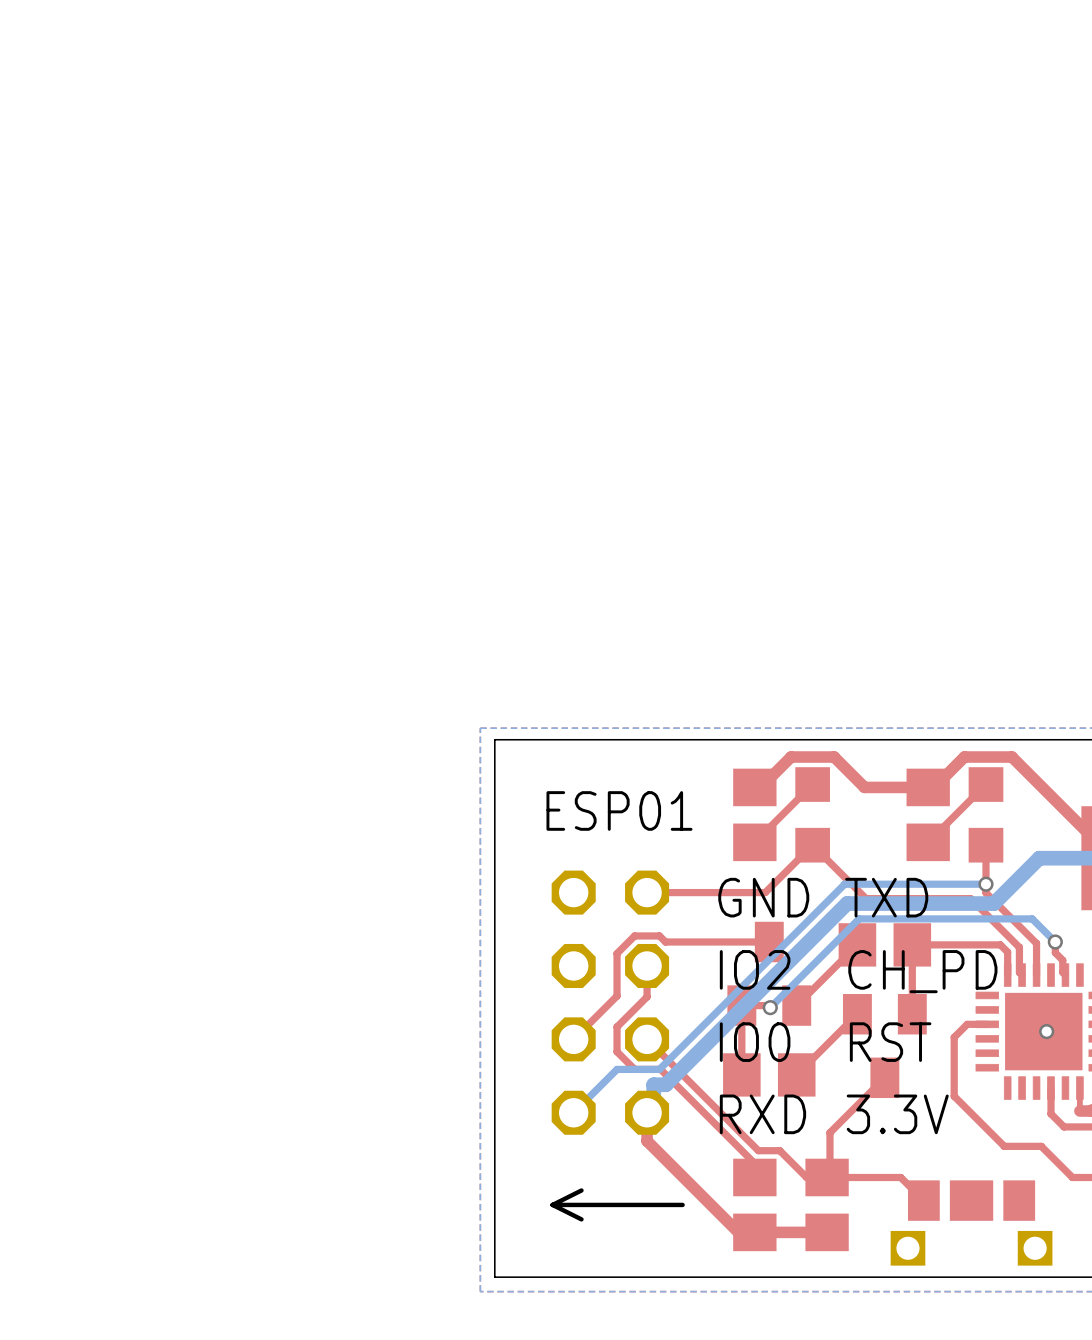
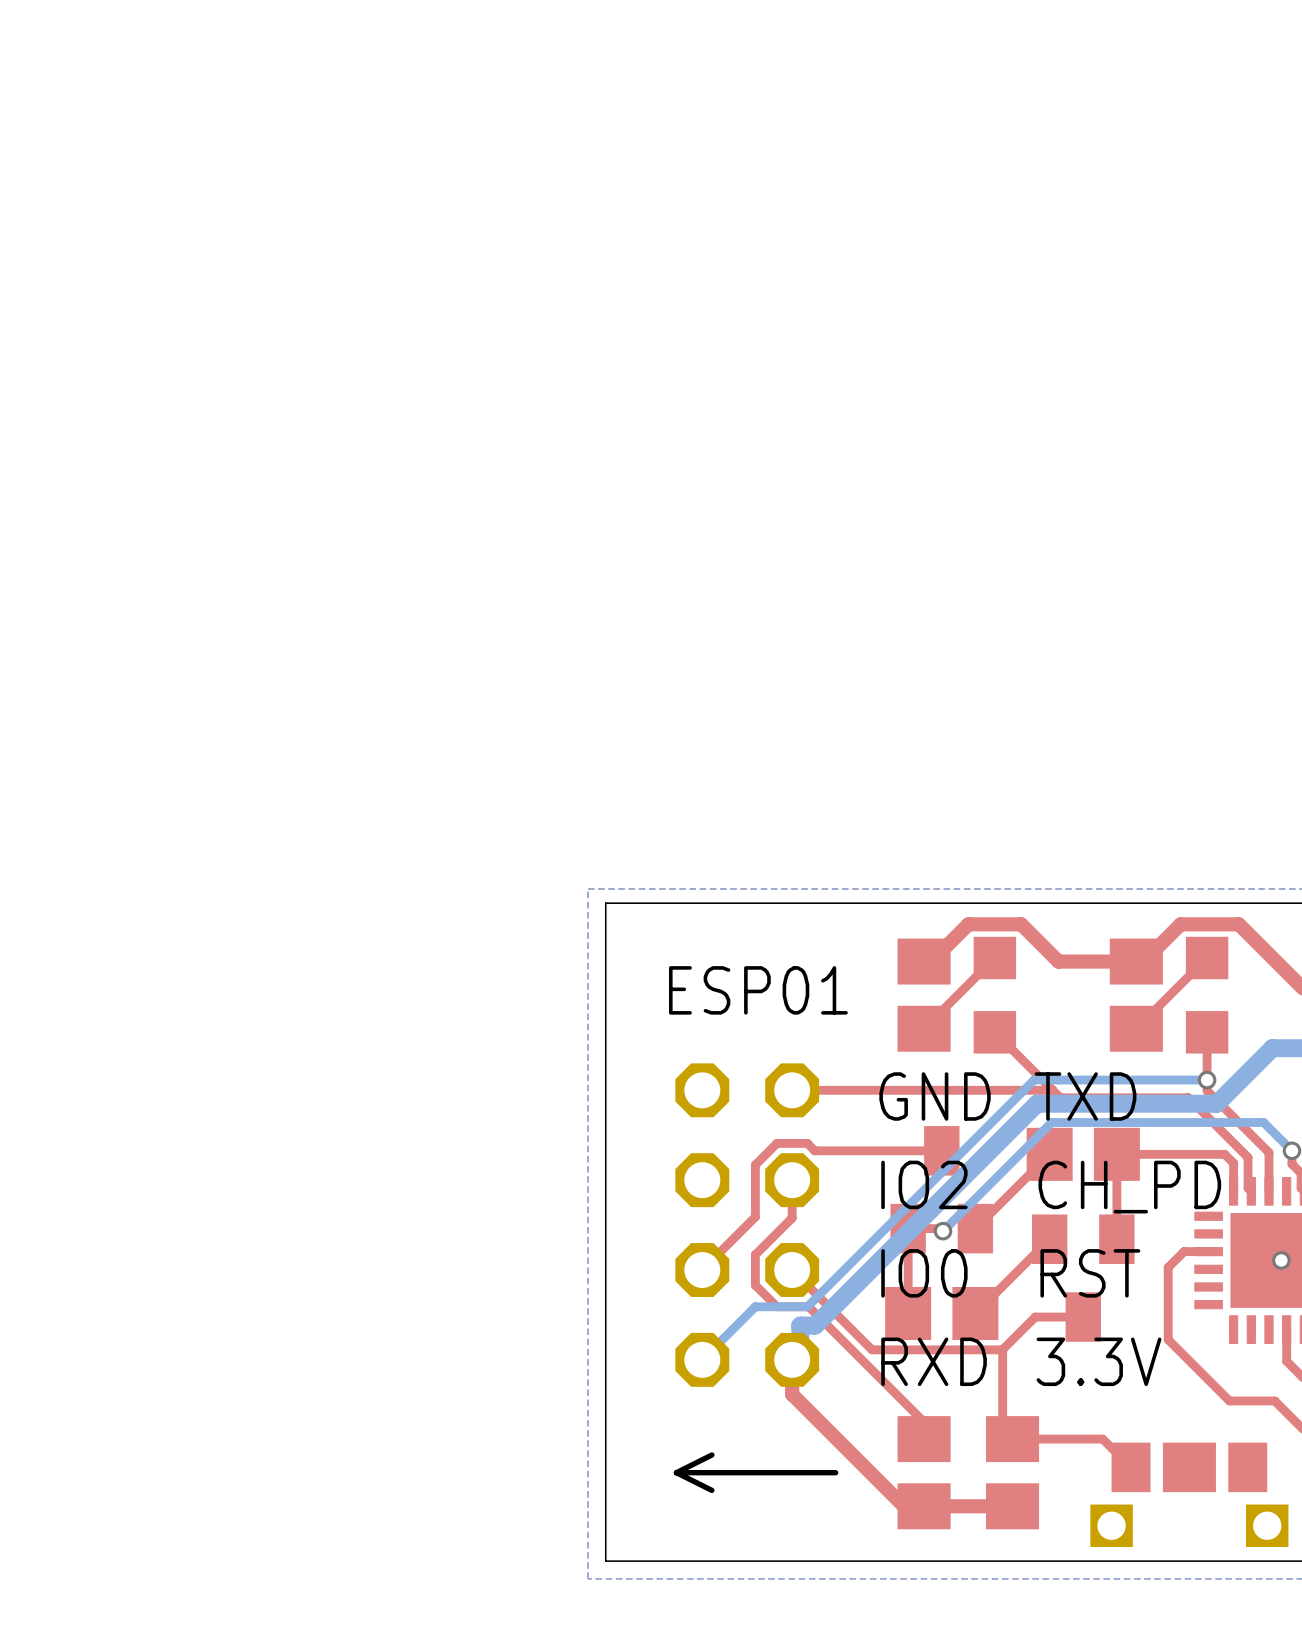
top track: (812, 845) (765, 892) -> (1052, 1090) (936, 1090)
top track: (884, 1077) (829, 1132) (829, 1177) -> none
top track: (712, 1104) (758, 1150) (779, 1150) (806, 1177) (827, 1177) -> (872, 1349) (1002, 1349) (1035, 1317) (1083, 1317)
top track: none -> (1002, 1349) (1002, 1429)

